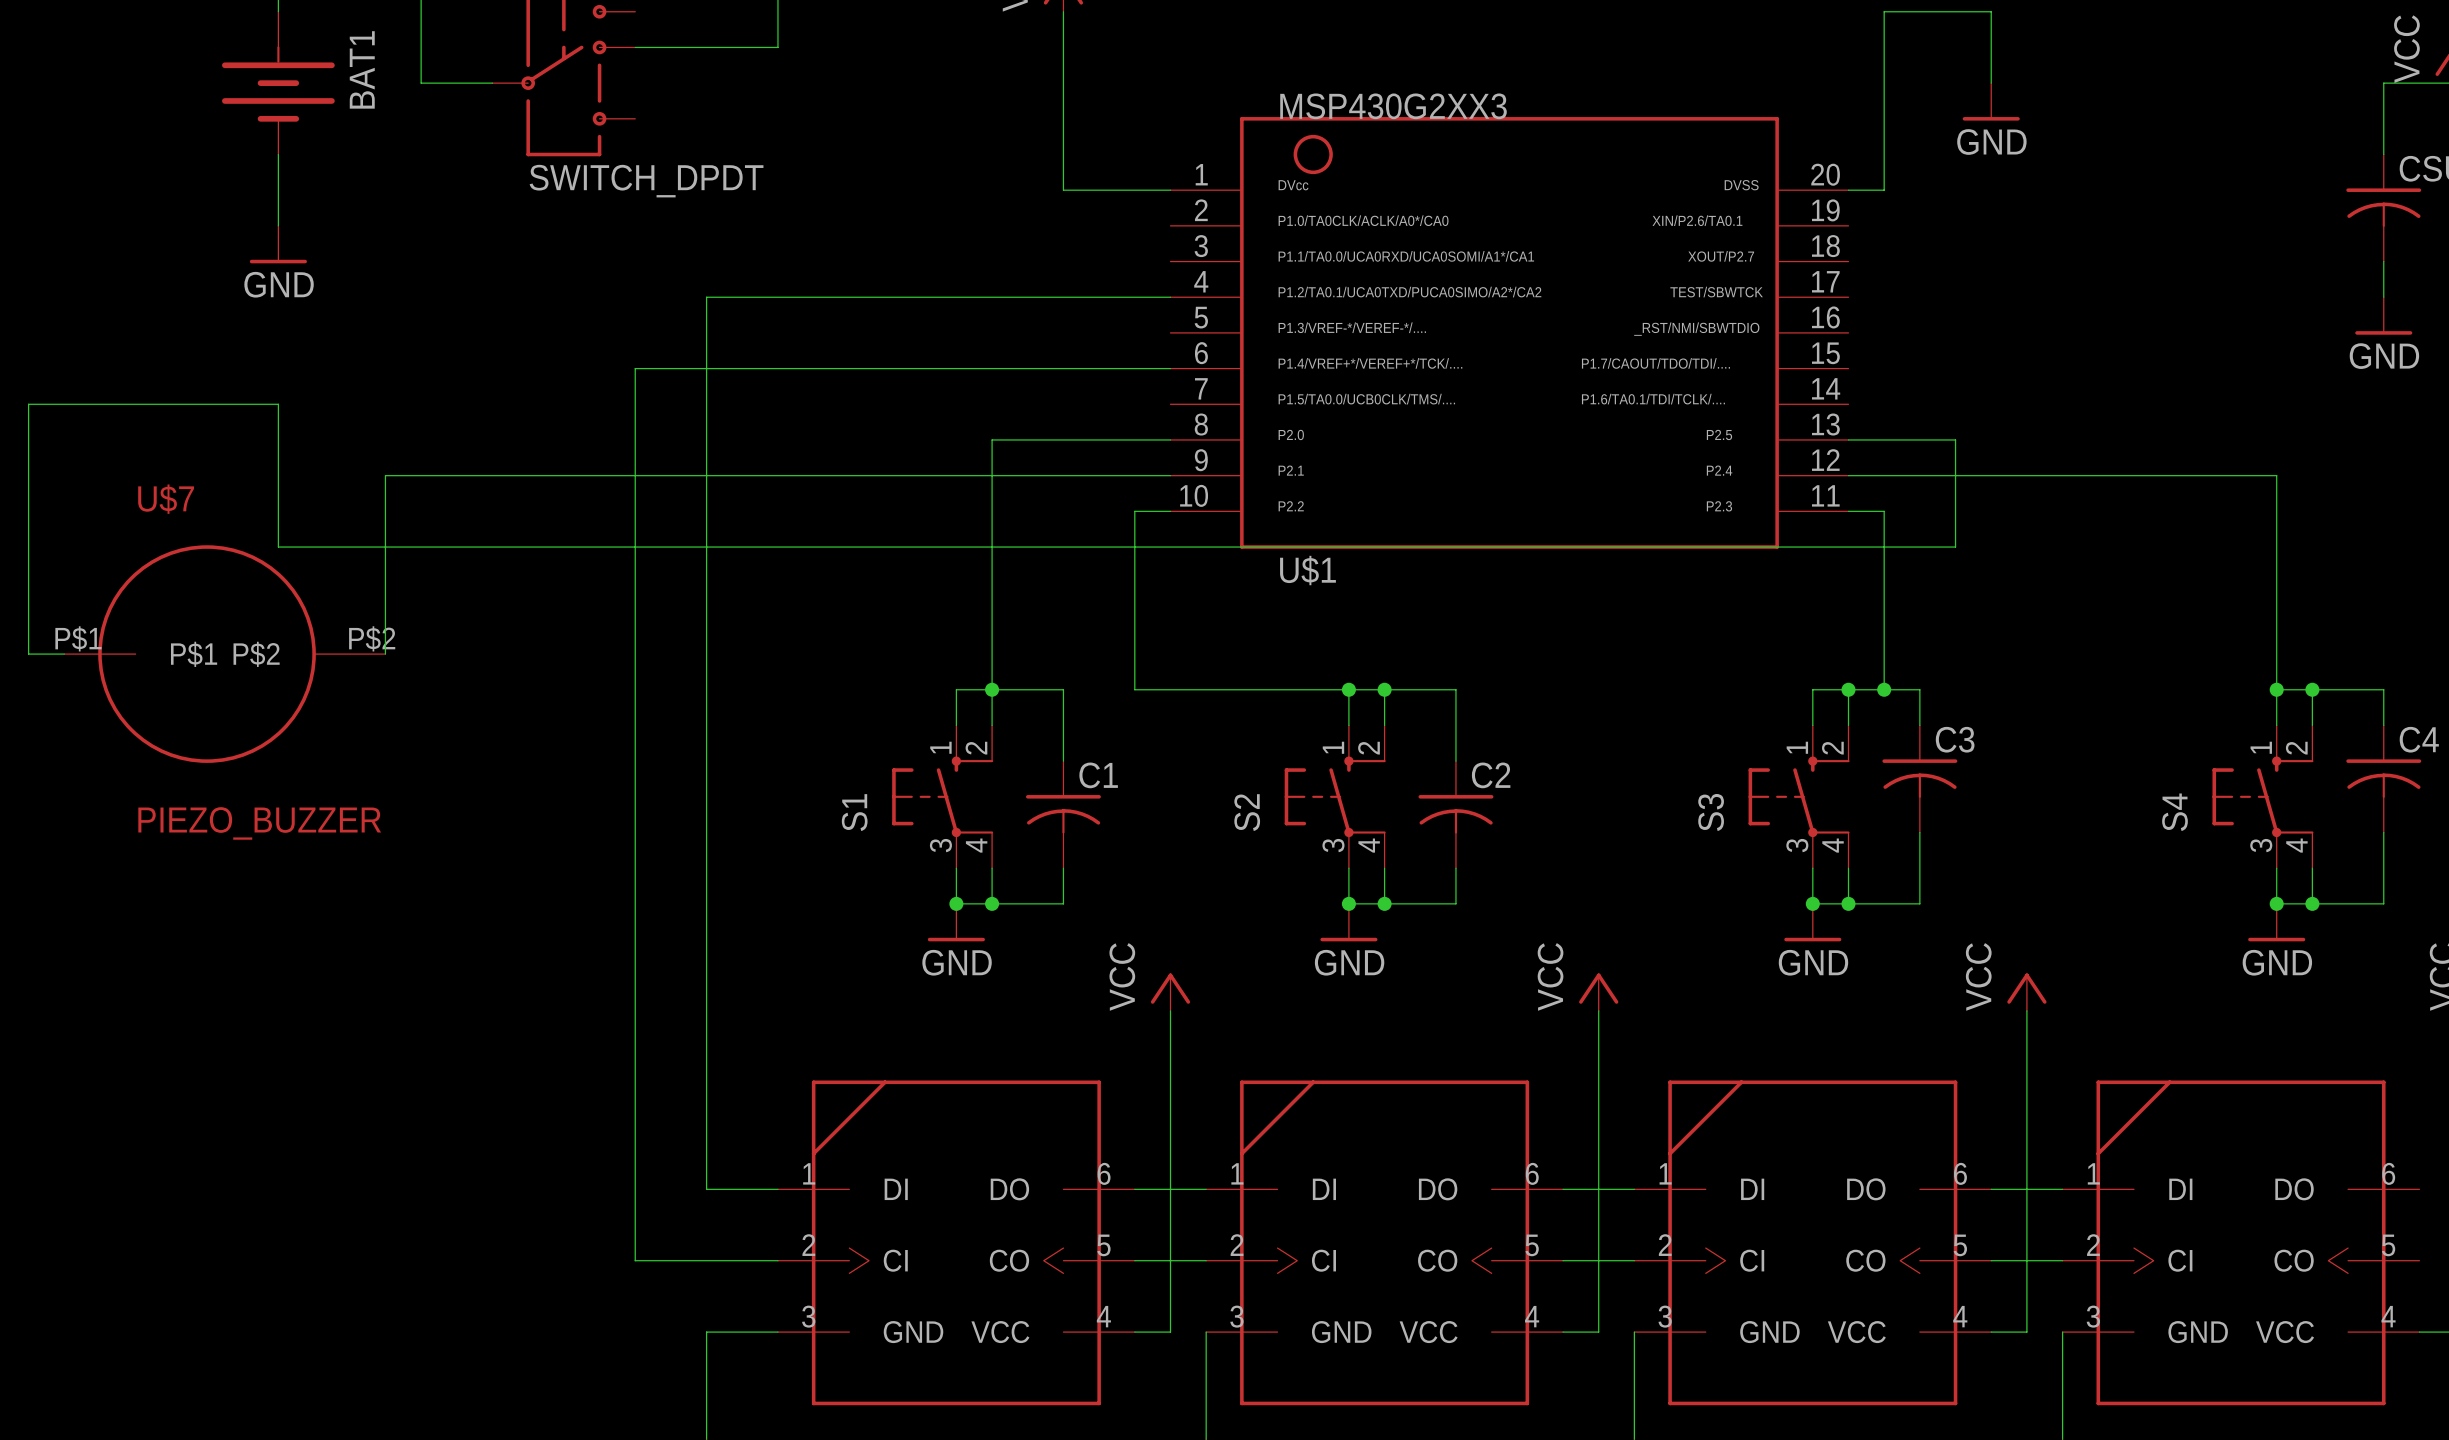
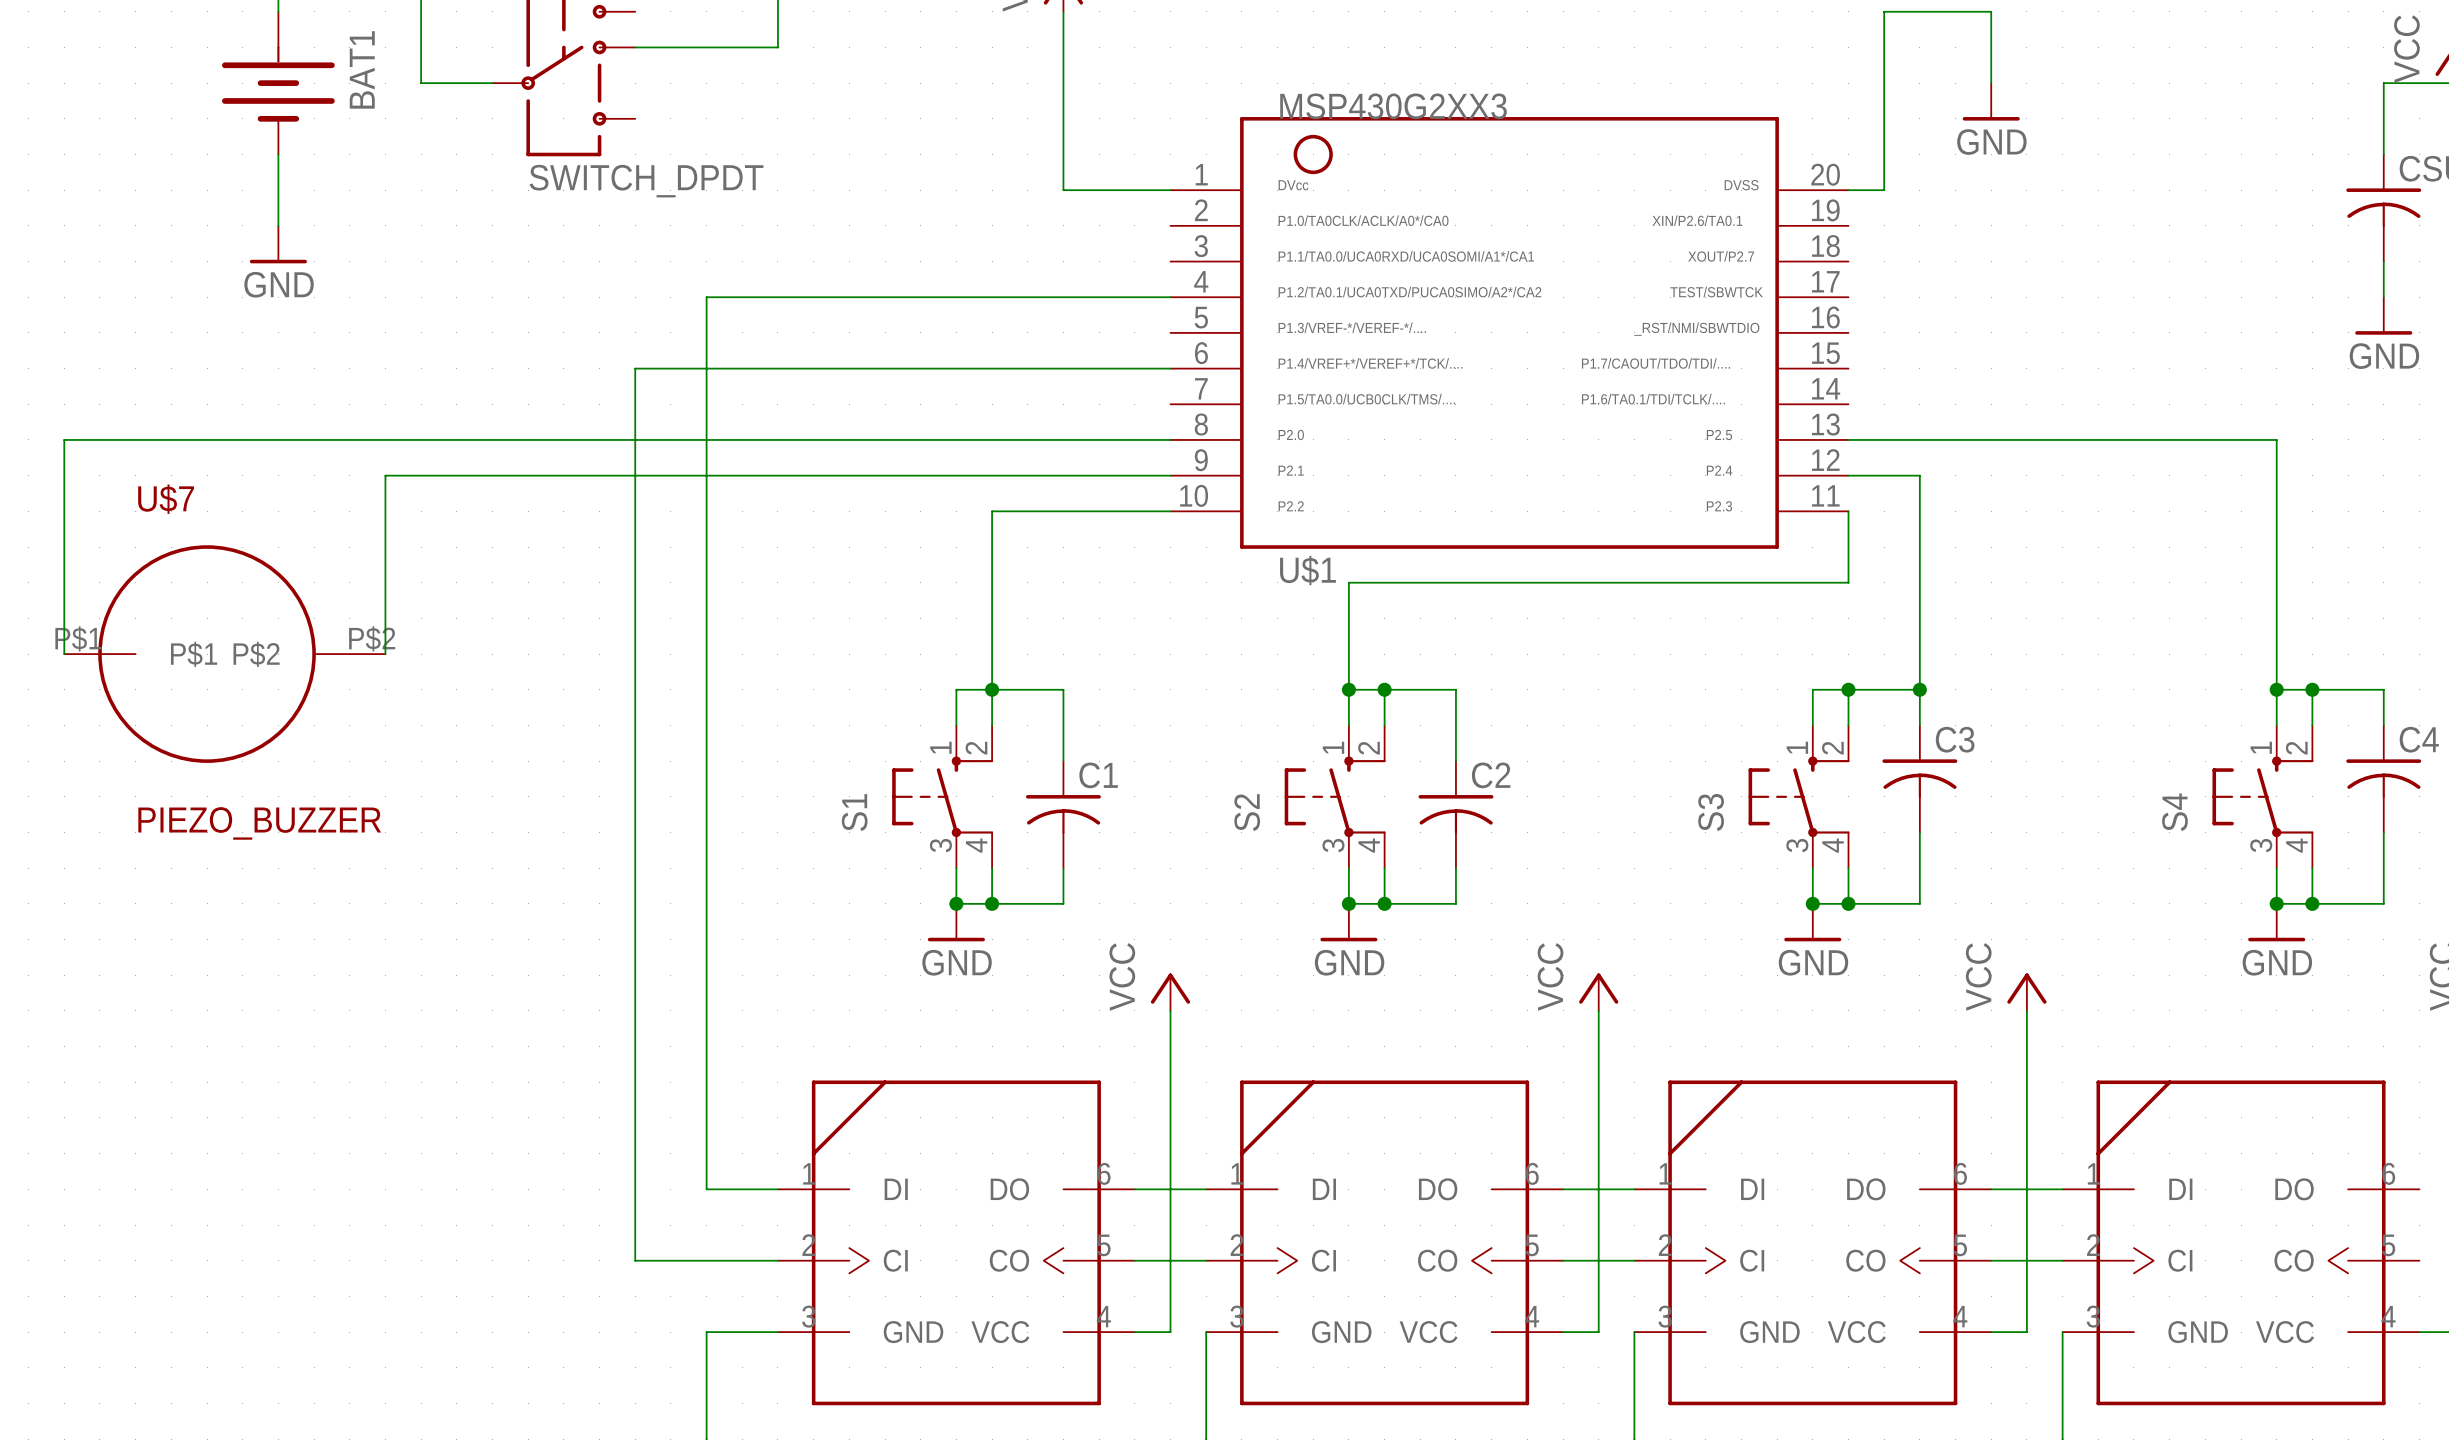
wire: (992, 439) (992, 511) -> (1134, 511) (992, 511)
wire: (1955, 439) (1955, 547) (278, 547) (278, 404) (28, 404) (28, 654) (64, 654) -> (992, 439) (64, 439) (64, 654)
wire: (1919, 475) (2276, 475) -> (1955, 439) (2276, 439) (2276, 475)
wire: none -> (1919, 475) (1919, 689)
wire: (1134, 511) (1134, 689) (1348, 689) -> none
wire: (1848, 511) (1884, 511) (1884, 689) -> (1848, 511) (1848, 582) (1348, 582) (1348, 689)
junction position: (1884, 689) -> (1919, 689)

